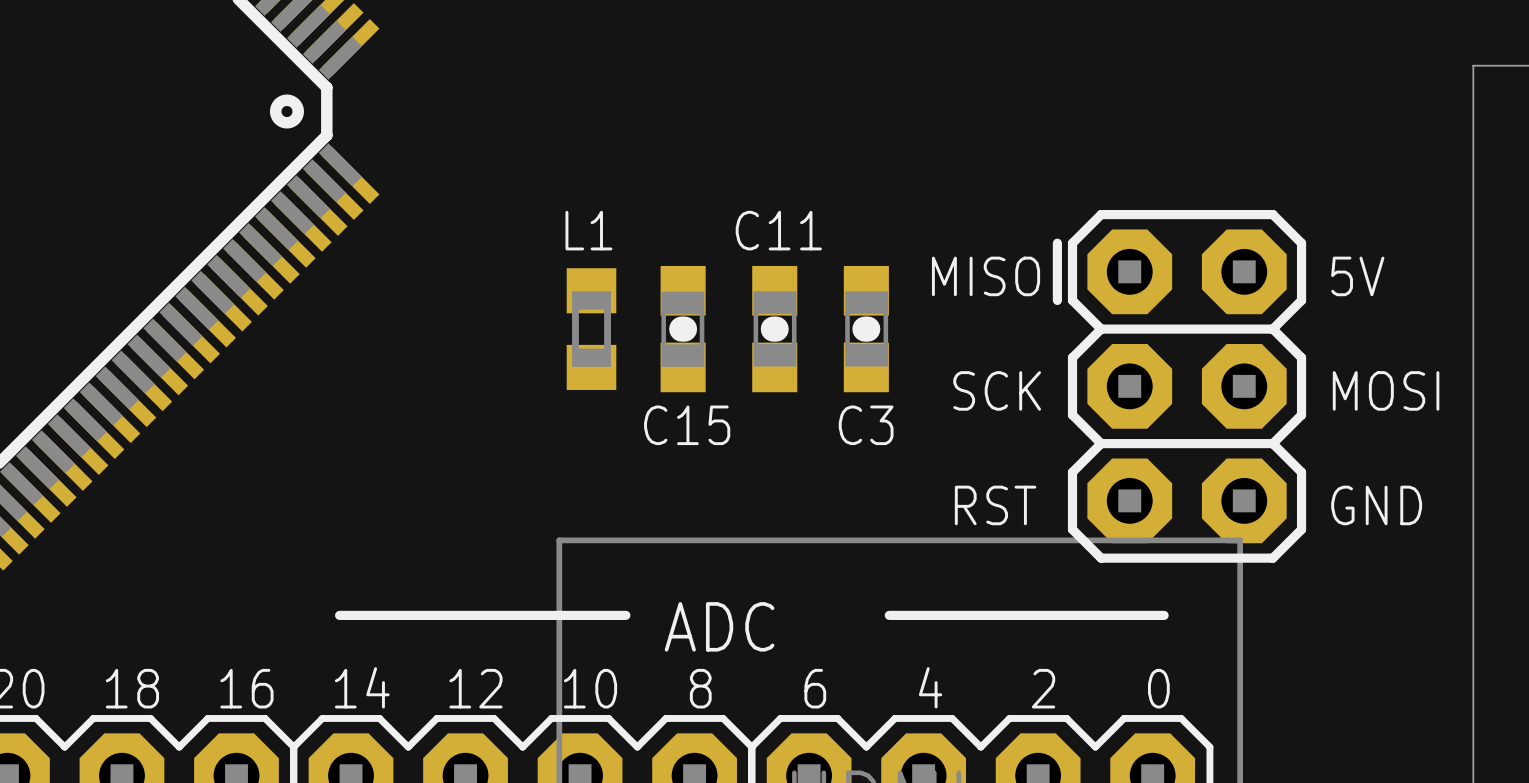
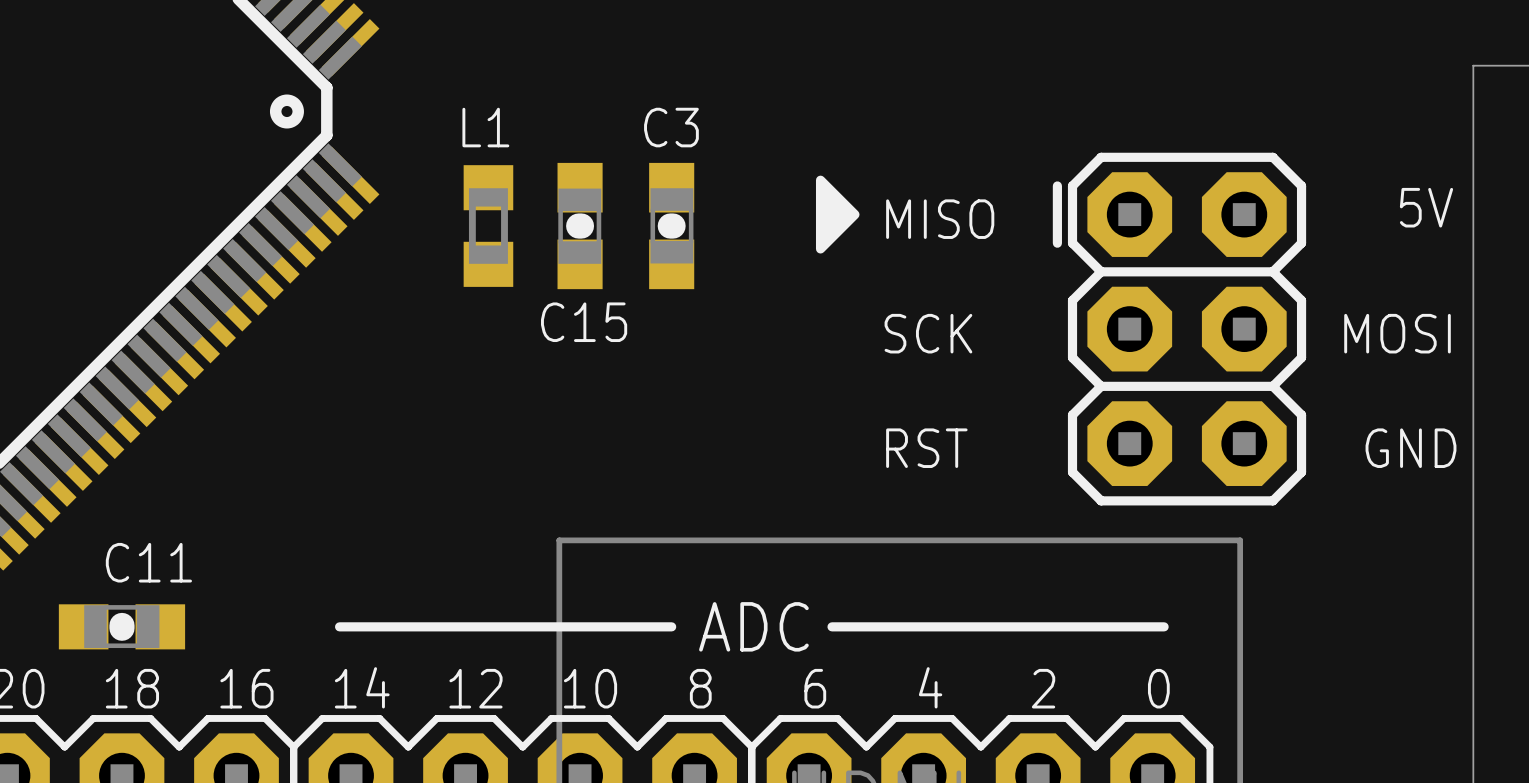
drawing: none -> [815, 175, 860, 254]
part: none -> (580, 226)
part: none -> (671, 226)
text position: L1 (588, 230) -> L1 (485, 127)
text position: C11 (778, 230) -> C11 (148, 562)
text position: MISO (986, 276) -> MISO (940, 219)
text position: 5V (1357, 276) -> 5V (1426, 207)
part position: (591, 329) -> (488, 226)
part: (683, 329) -> none
part: (774, 329) -> none
part: (866, 329) -> none
part position: (1179, 386) -> (1179, 329)
text position: SCK (997, 390) -> SCK (928, 333)
text position: MOSI (1386, 390) -> MOSI (1397, 333)
text position: C15 (687, 425) -> C15 (584, 322)
text position: C3 (866, 425) -> C3 (671, 127)
text position: RST (995, 505) -> RST (926, 448)
text position: GND (1376, 505) -> GND (1410, 448)
line: (339, 615) (625, 615) -> none
line: (889, 615) (1164, 615) -> none
part: none -> (121, 626)
line: none -> (339, 626) (671, 626)
text position: ADC (719, 626) -> ADC (753, 626)
line: none -> (832, 626) (1164, 626)

